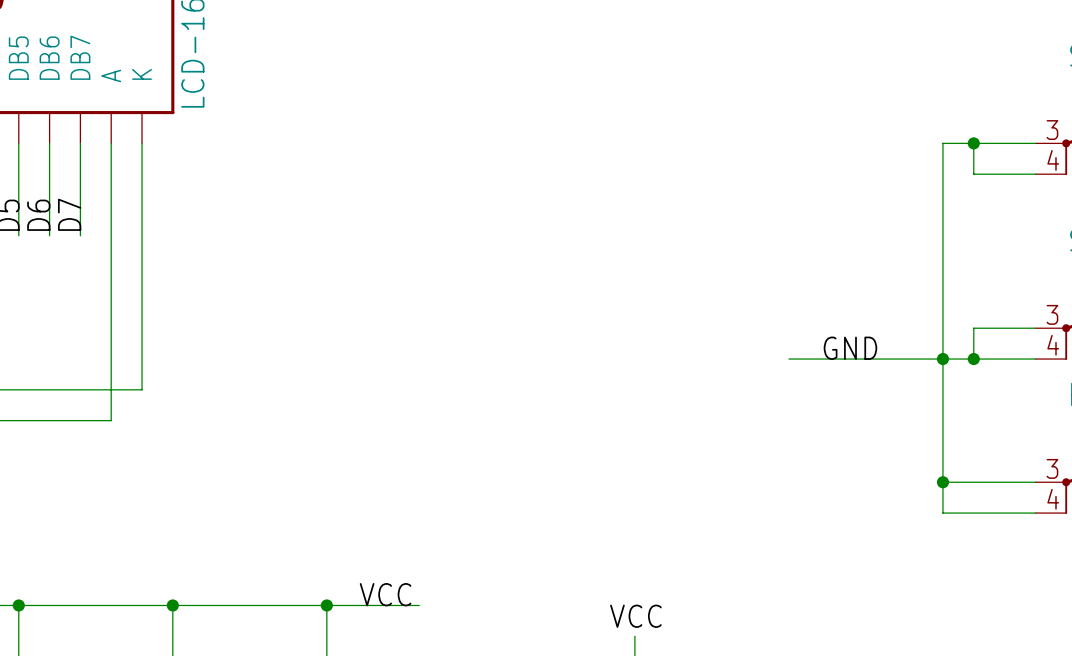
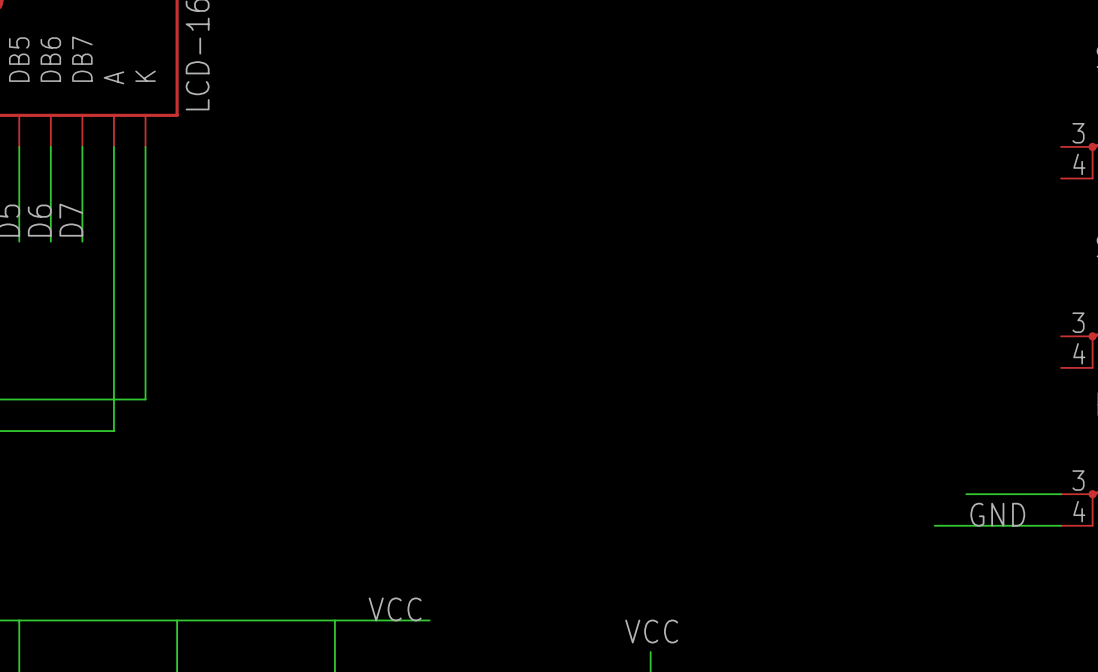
wire: (973, 143) (973, 174) (1035, 174) -> none
junction: (973, 143) -> none
wire: (1035, 143) (942, 143) (942, 513) -> (934, 525) (966, 525)
wire: (1035, 328) (973, 328) (973, 359) -> none
label: GND (850, 348) -> none
wire: (788, 359) (1035, 359) -> none
junction: (942, 359) -> none
junction: (973, 359) -> none
junction: (942, 482) -> none
label: none -> GND (997, 514)
junction: (18, 605) -> none
junction: (172, 605) -> none
junction: (326, 605) -> none

